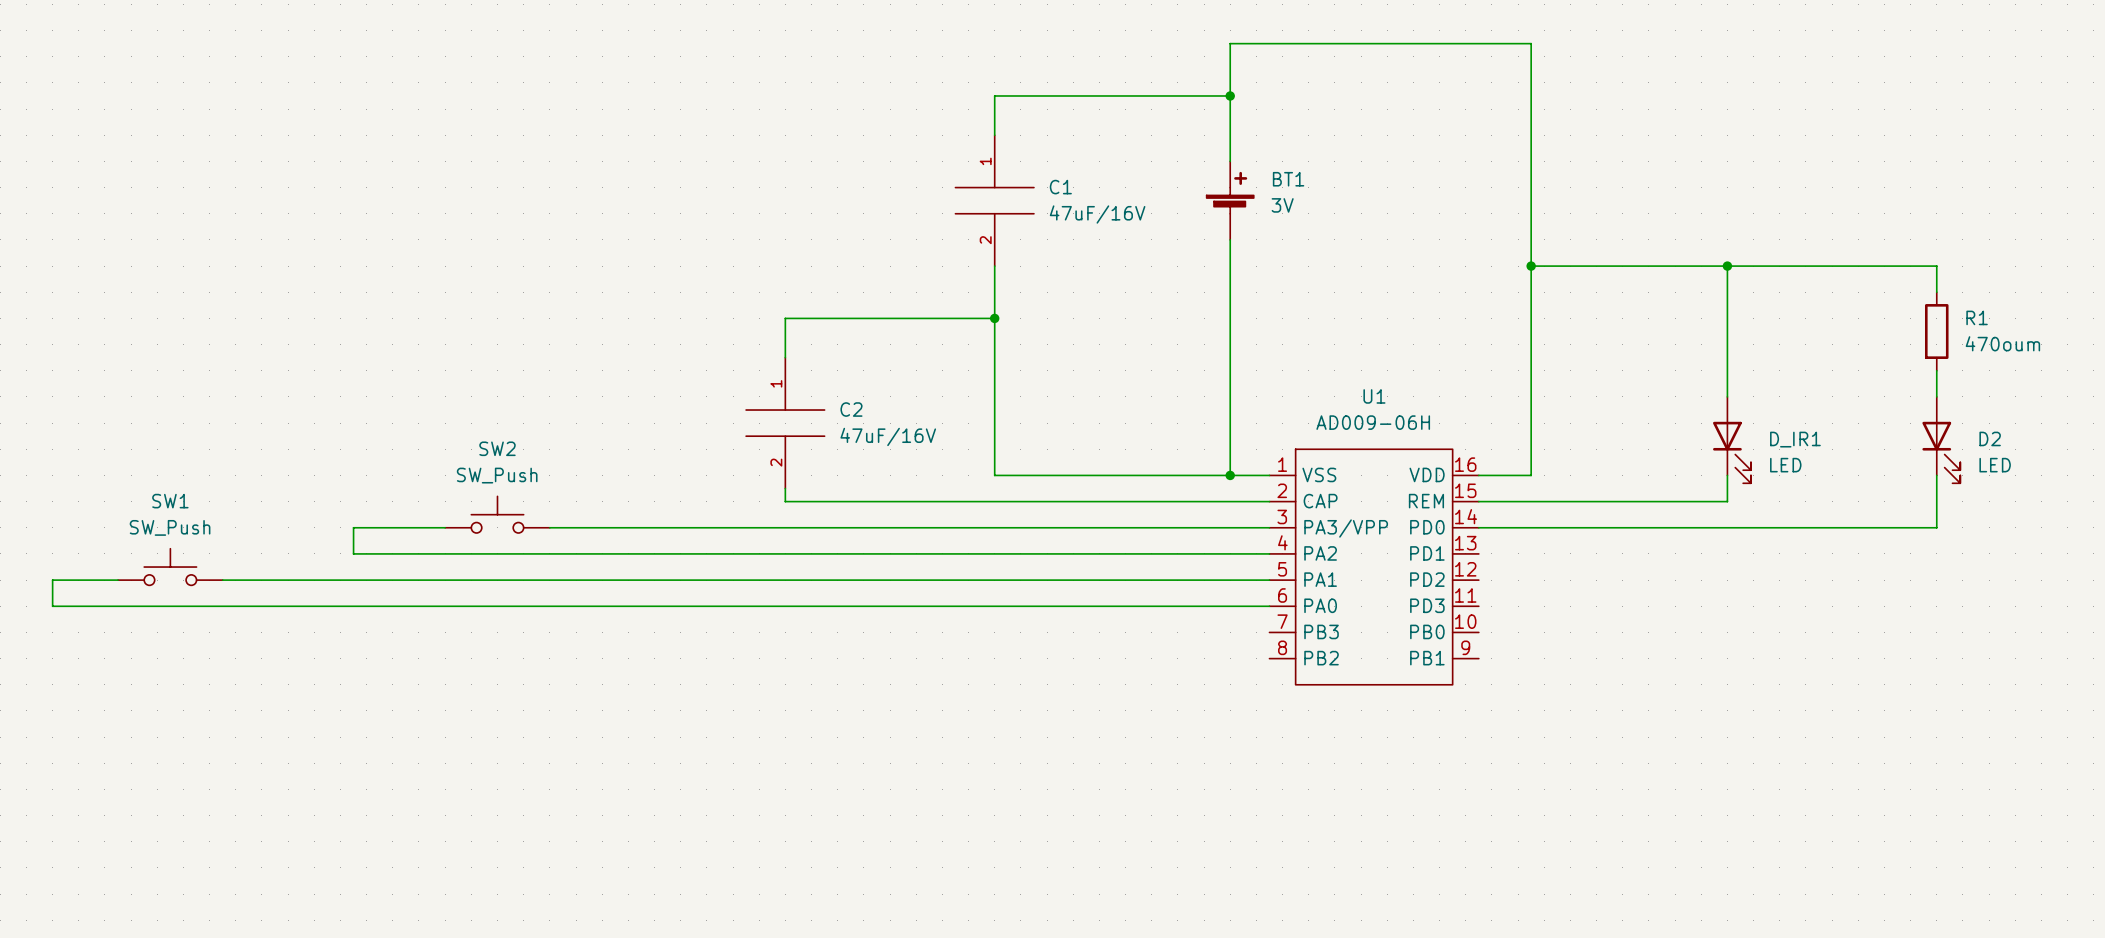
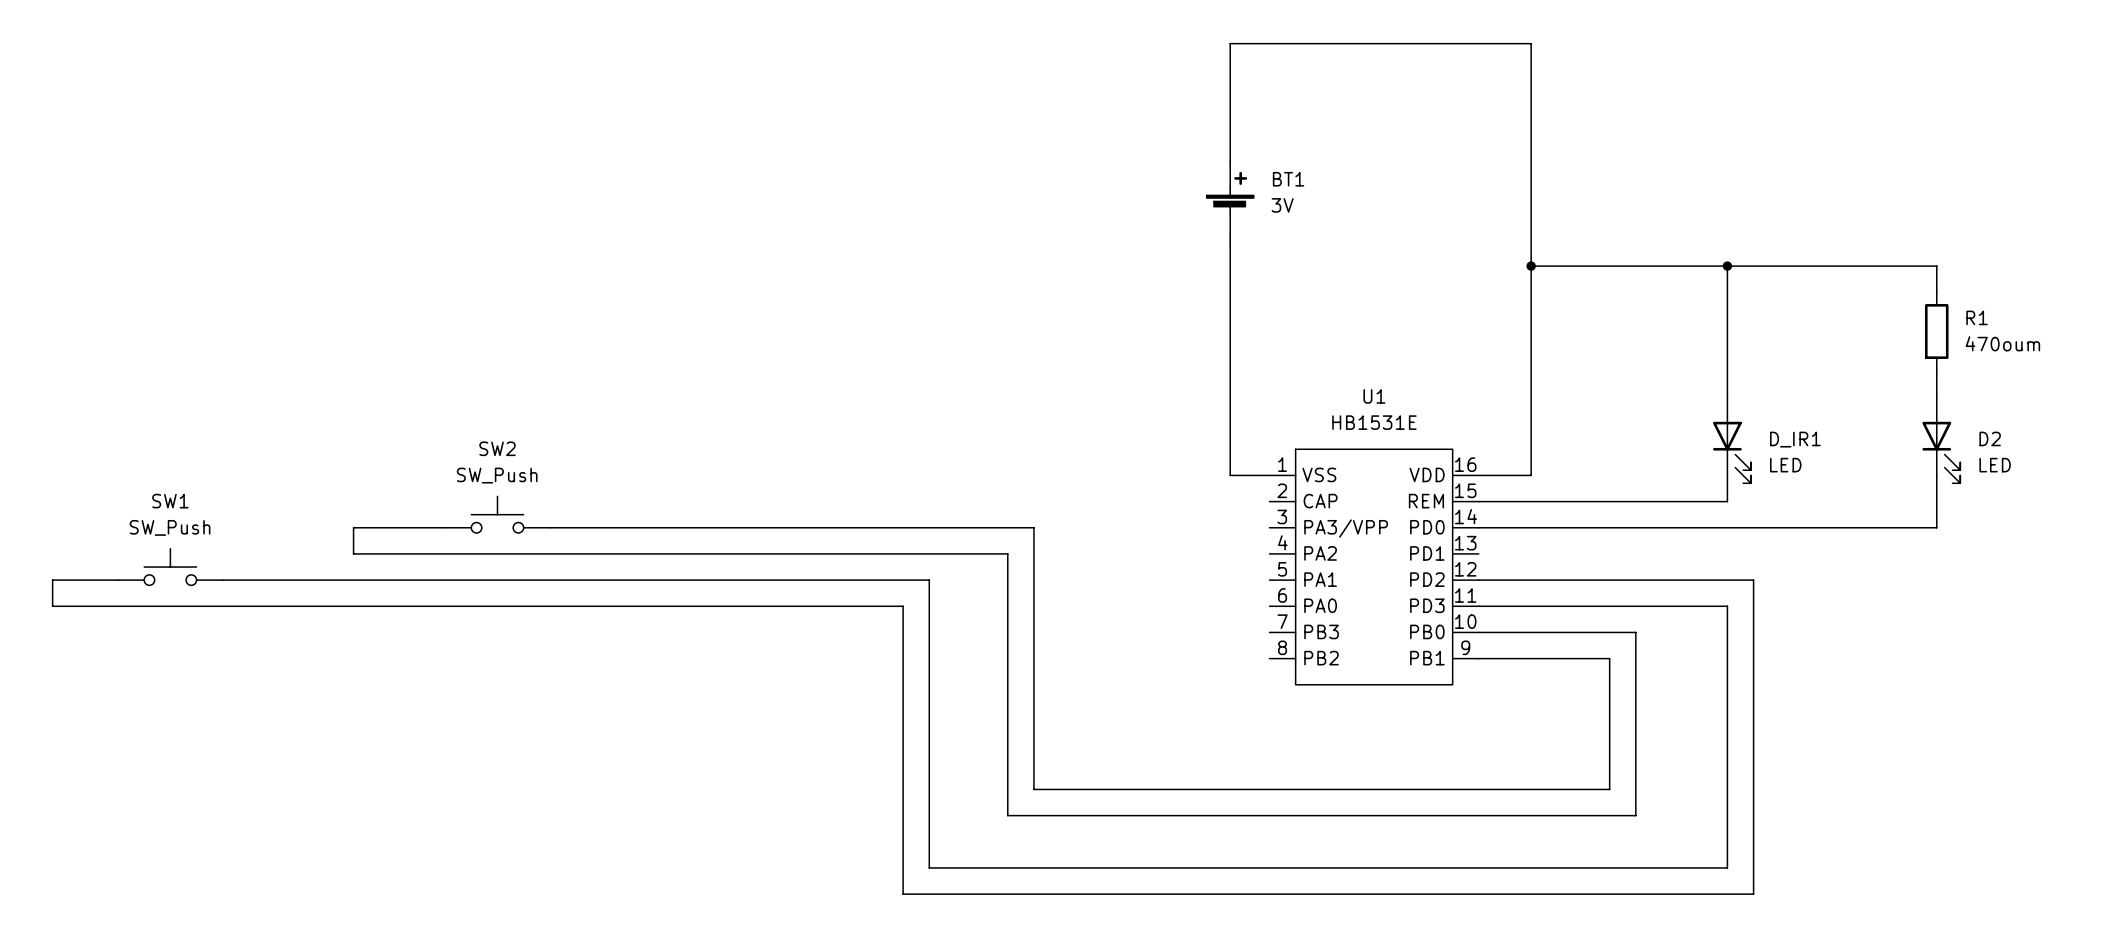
wire: (1230, 95) (994, 95) (994, 135) -> none
junction: (1230, 95) -> none
C1: 47uF/16V (994, 200) -> none
wire: (994, 266) (994, 475) (1230, 475) -> none
wire: (994, 318) (785, 318) (785, 357) -> none
junction: (994, 318) -> none
U1 value: AD009-06H (1373, 422) -> HB1531E (1374, 422)
C2: 47uF/16V (785, 423) -> none
junction: (1230, 475) -> none
wire: (785, 488) (785, 501) (1269, 501) -> none
wire: (1033, 527) (1269, 527) -> (1033, 527) (1033, 789) (1609, 789) (1609, 658) (1478, 658)
wire: (1007, 553) (1269, 553) -> (1007, 553) (1007, 815) (1635, 815) (1635, 632) (1478, 632)
wire: (929, 580) (1269, 580) -> (929, 580) (929, 867) (1727, 867) (1727, 606) (1478, 606)
wire: (903, 606) (1269, 606) -> (903, 606) (903, 894) (1753, 894) (1753, 580) (1478, 580)

